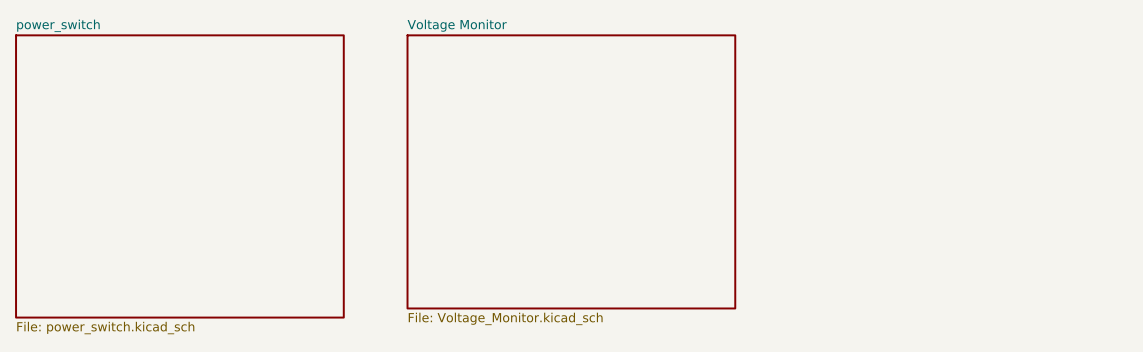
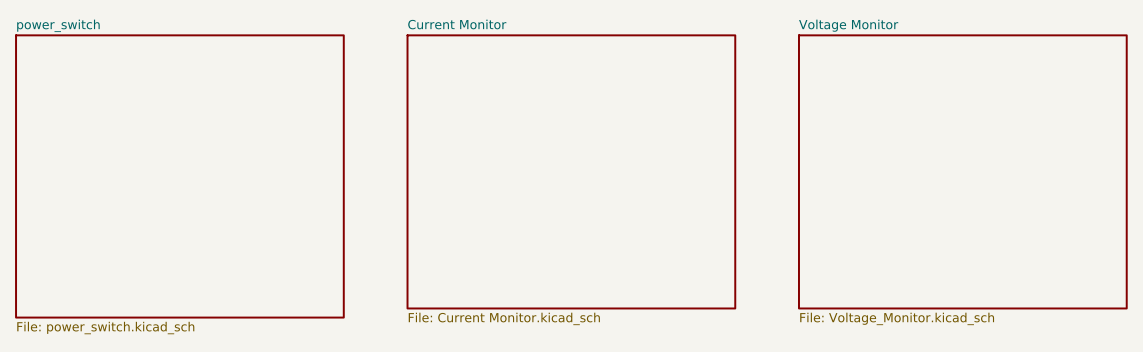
sheet Voltage Monitor name: Voltage Monitor (457, 25) -> Current Monitor (457, 24)
sheet Voltage Monitor: none -> File: Voltage_Monitor.kicad_sch (962, 171)
sheet Voltage Monitor value: File: Voltage_Monitor.kicad_sch (505, 318) -> File: Current Monitor.kicad_sch (504, 318)

